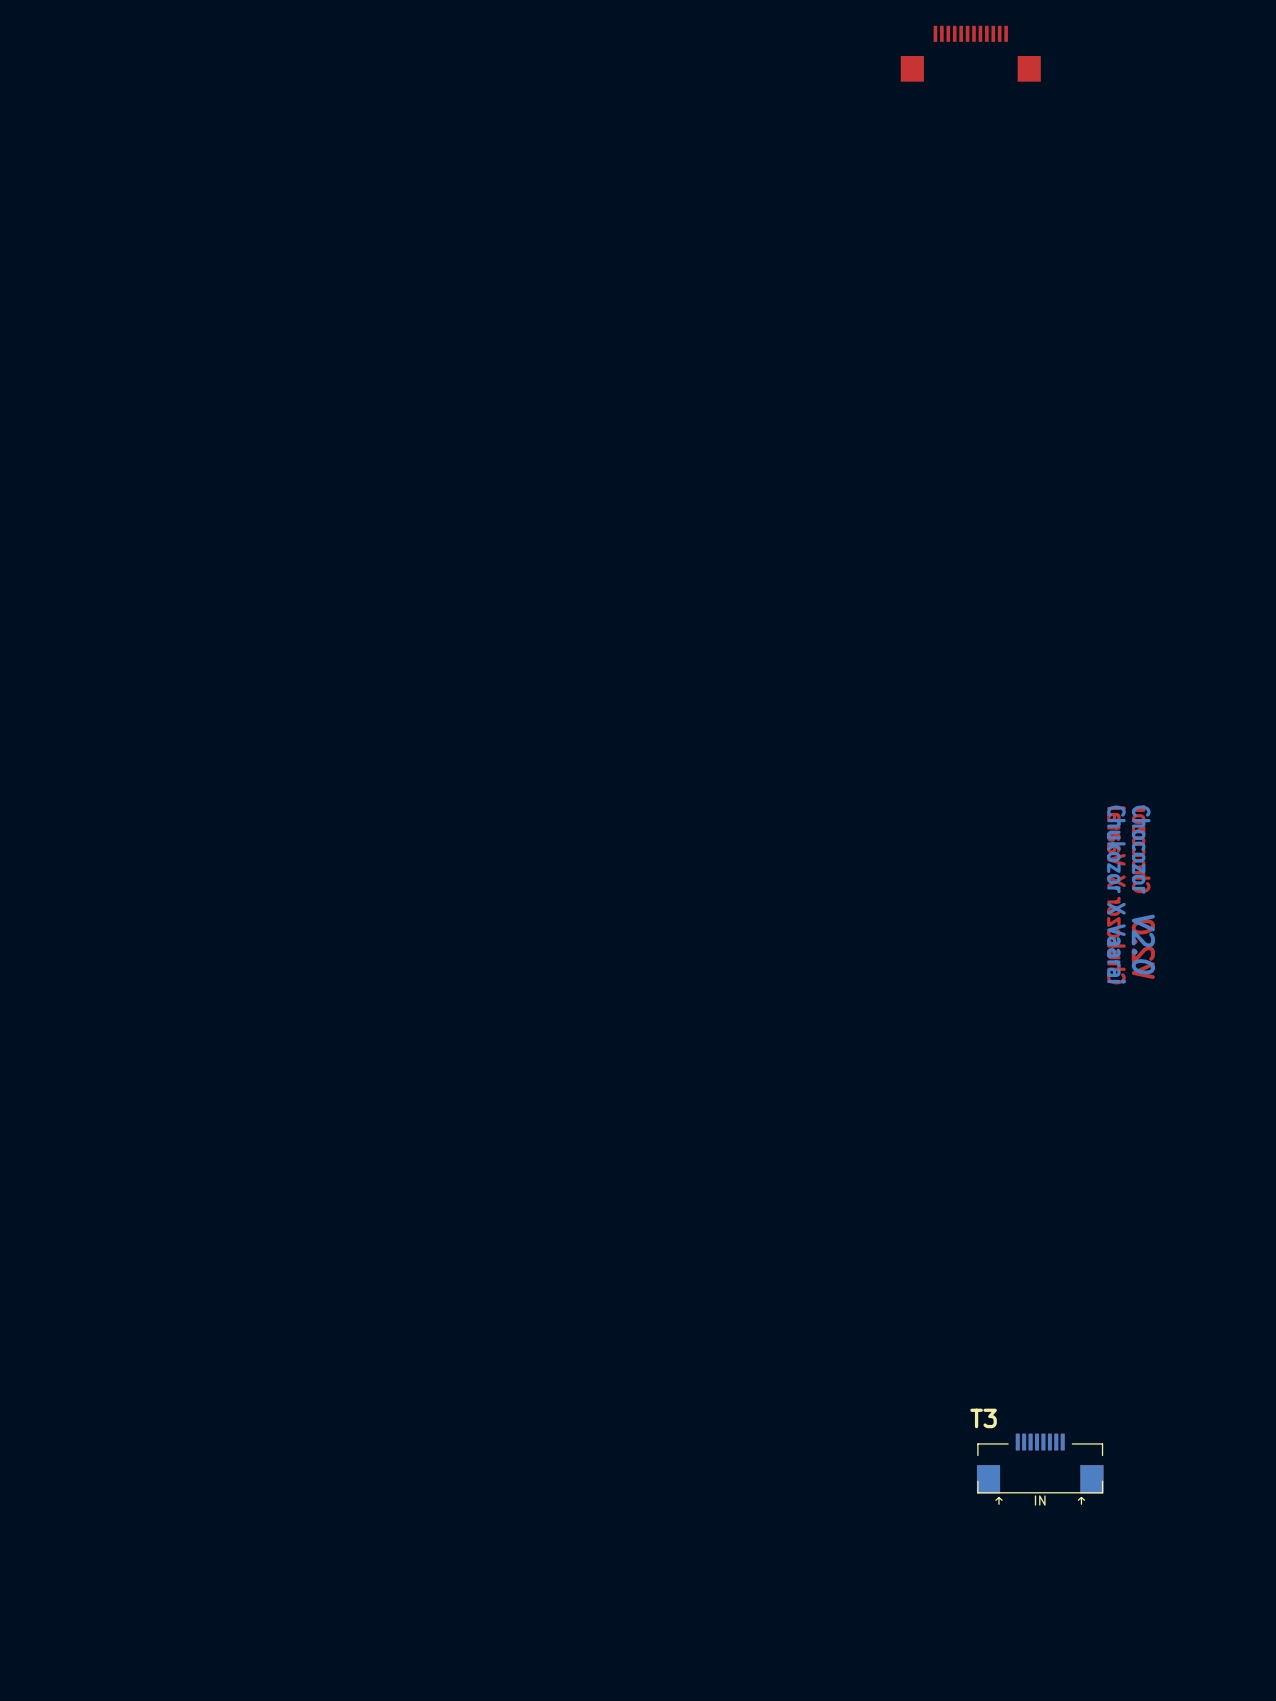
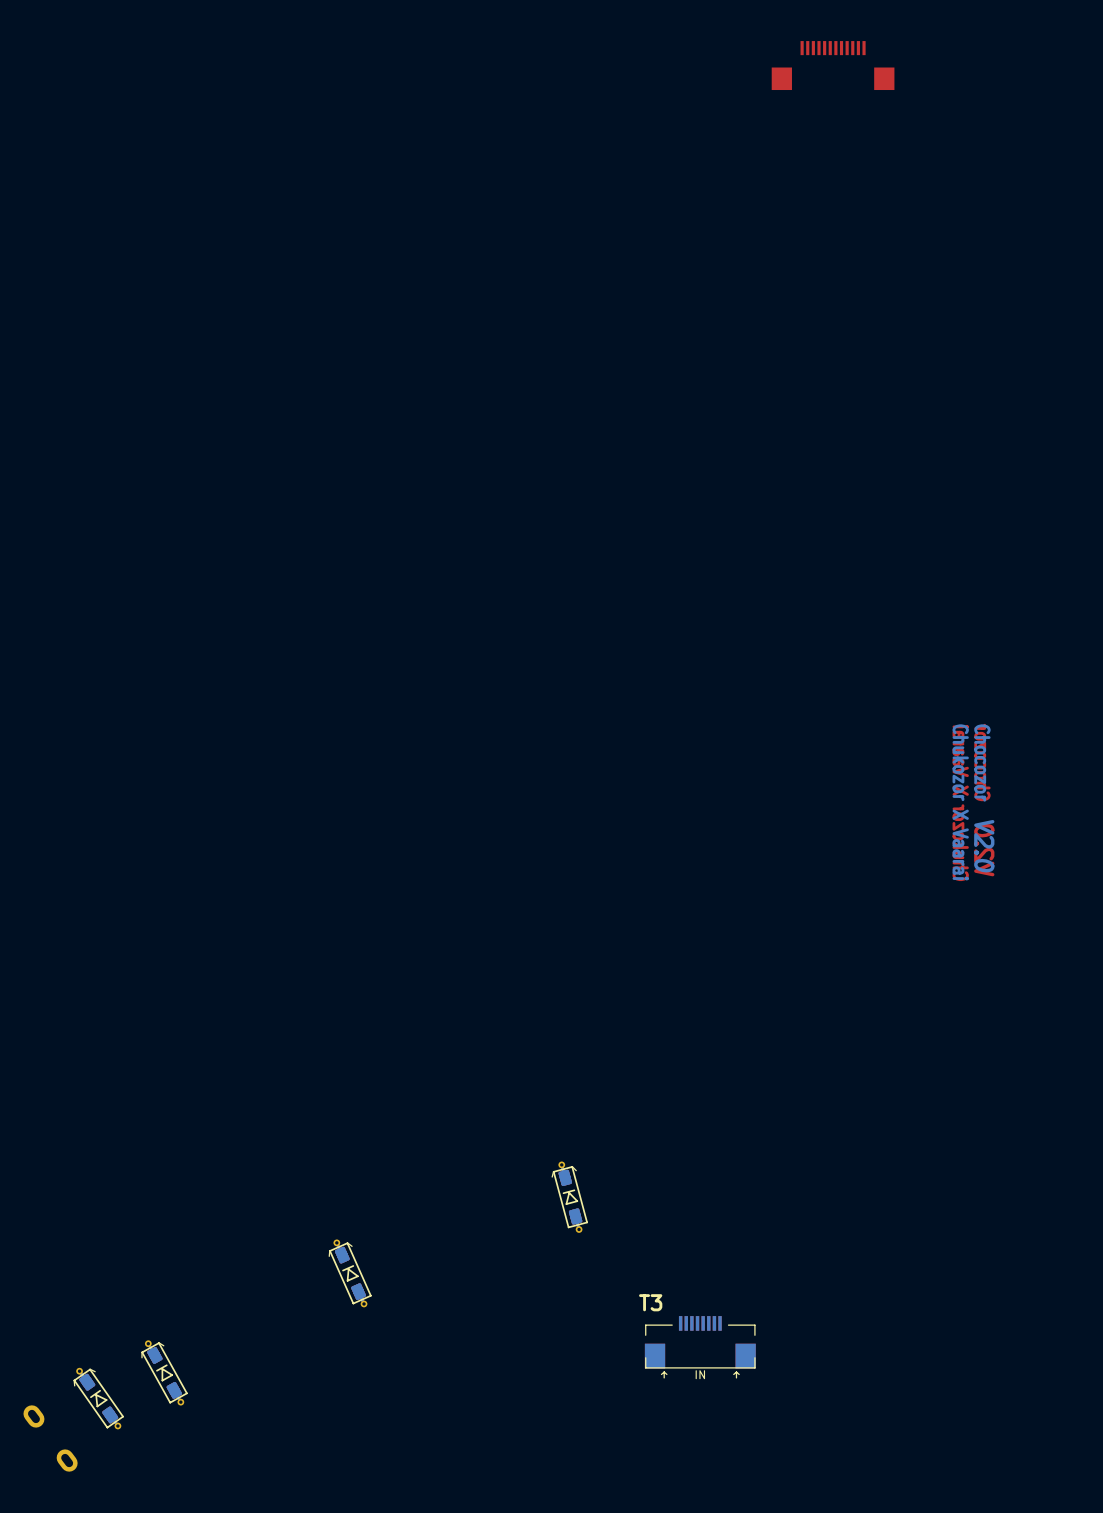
part: none -> (569, 1197)
part: none -> (350, 1273)
T3 position: (1040, 1469) -> (700, 1347)
part: none -> (164, 1372)
part: none -> (98, 1398)
part: none -> (50, 1438)

